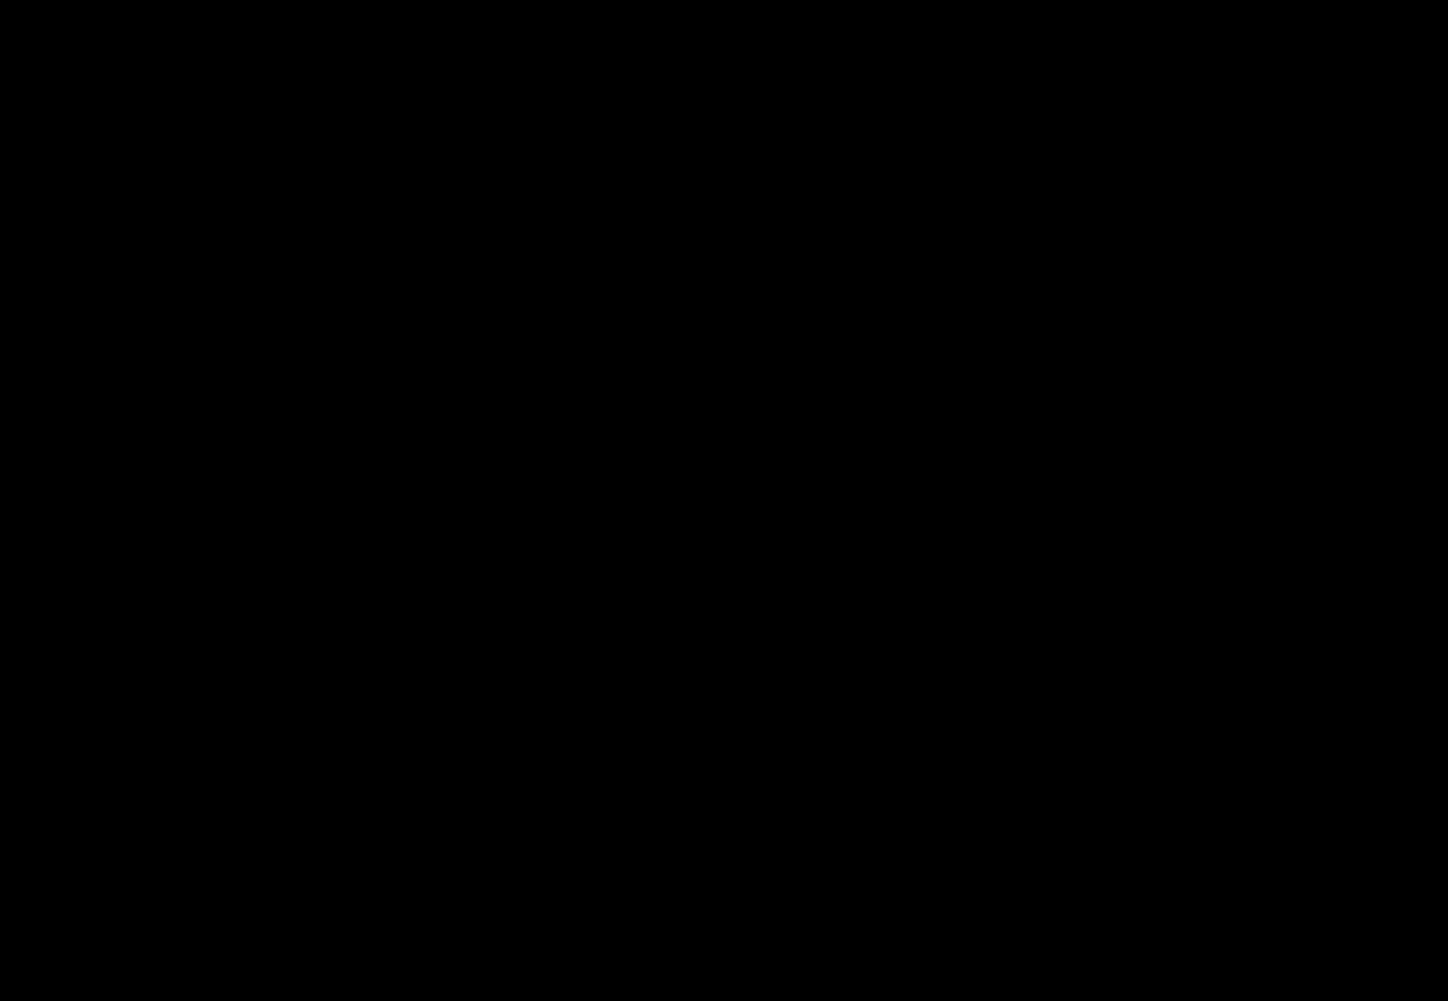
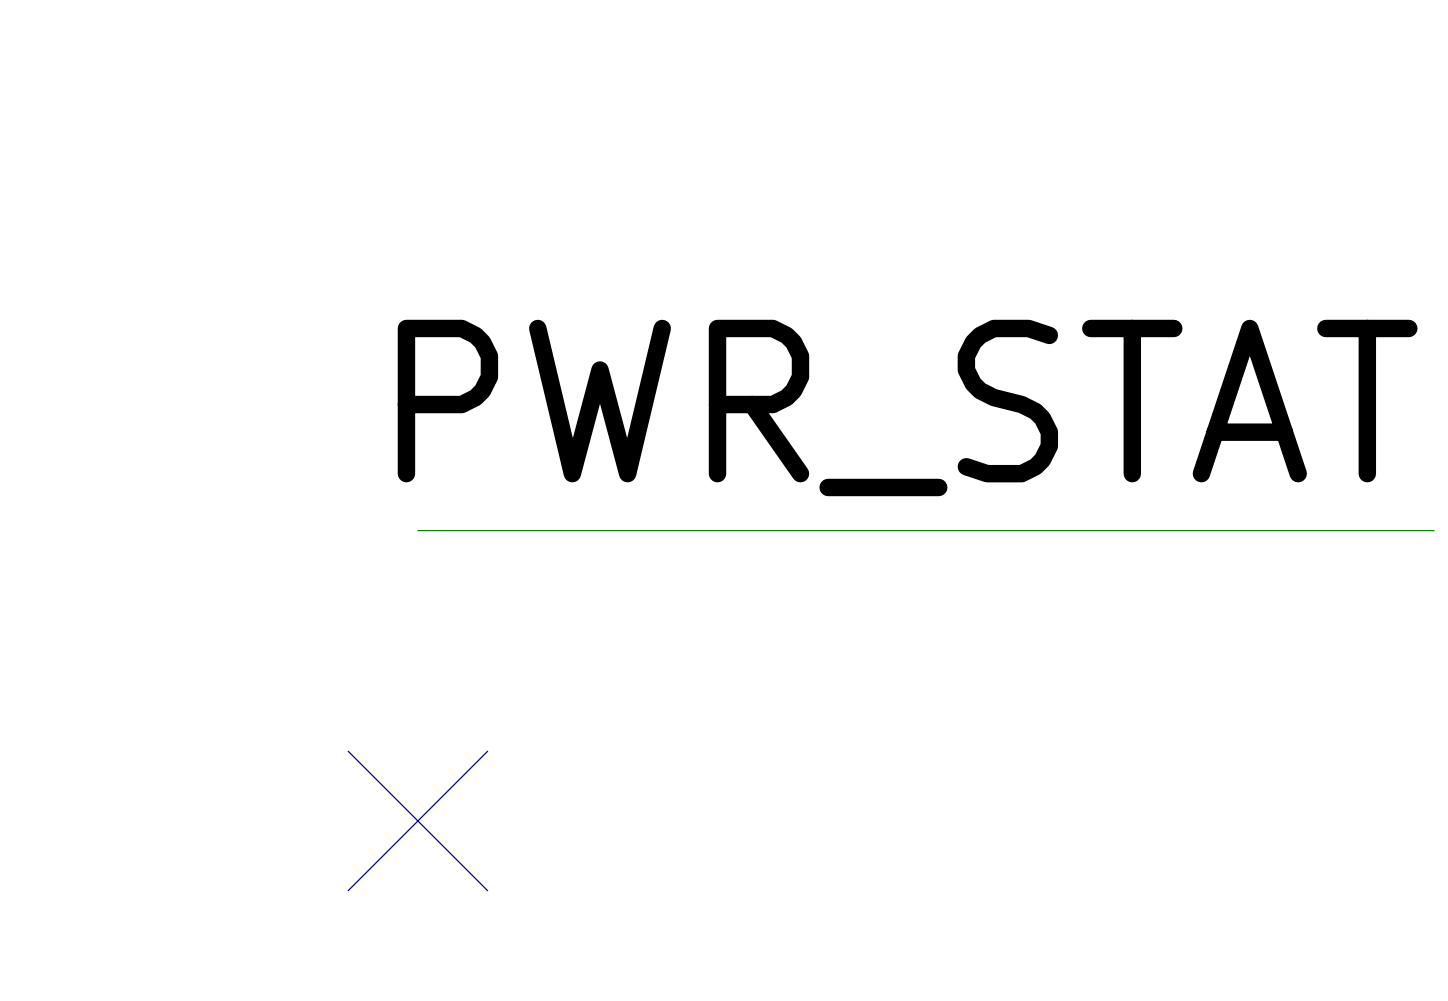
label: none -> PWR_STAT (907, 407)
wire: none -> (417, 530) (1434, 530)
no-connect mark: none -> (417, 820)

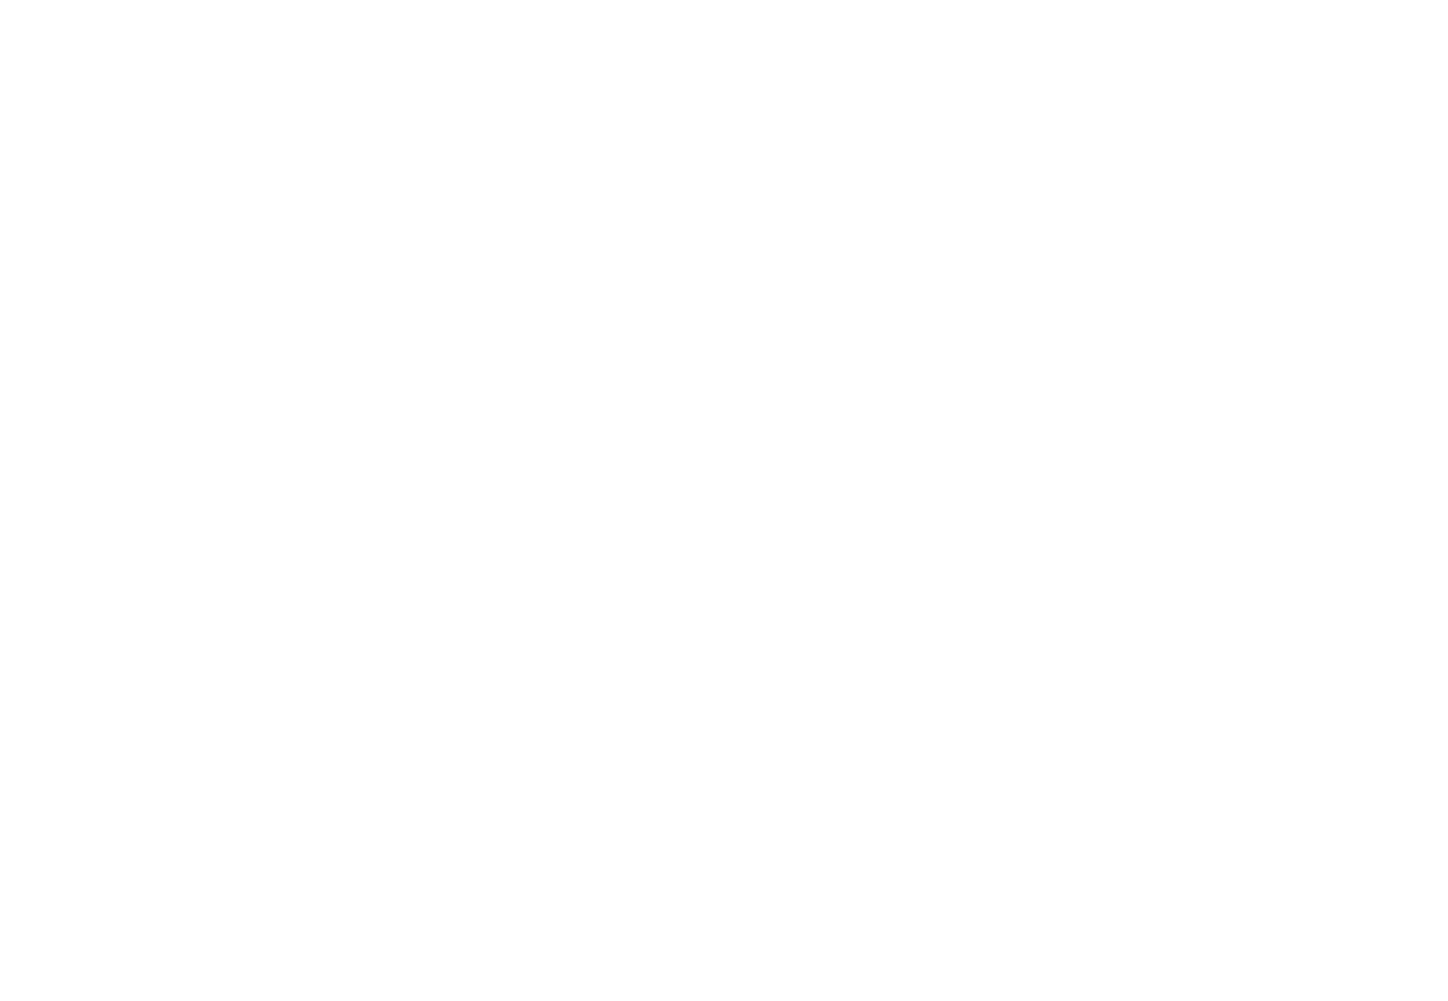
label: PWR_STAT (907, 407) -> none
wire: (417, 530) (1434, 530) -> none
no-connect mark: (417, 820) -> none

